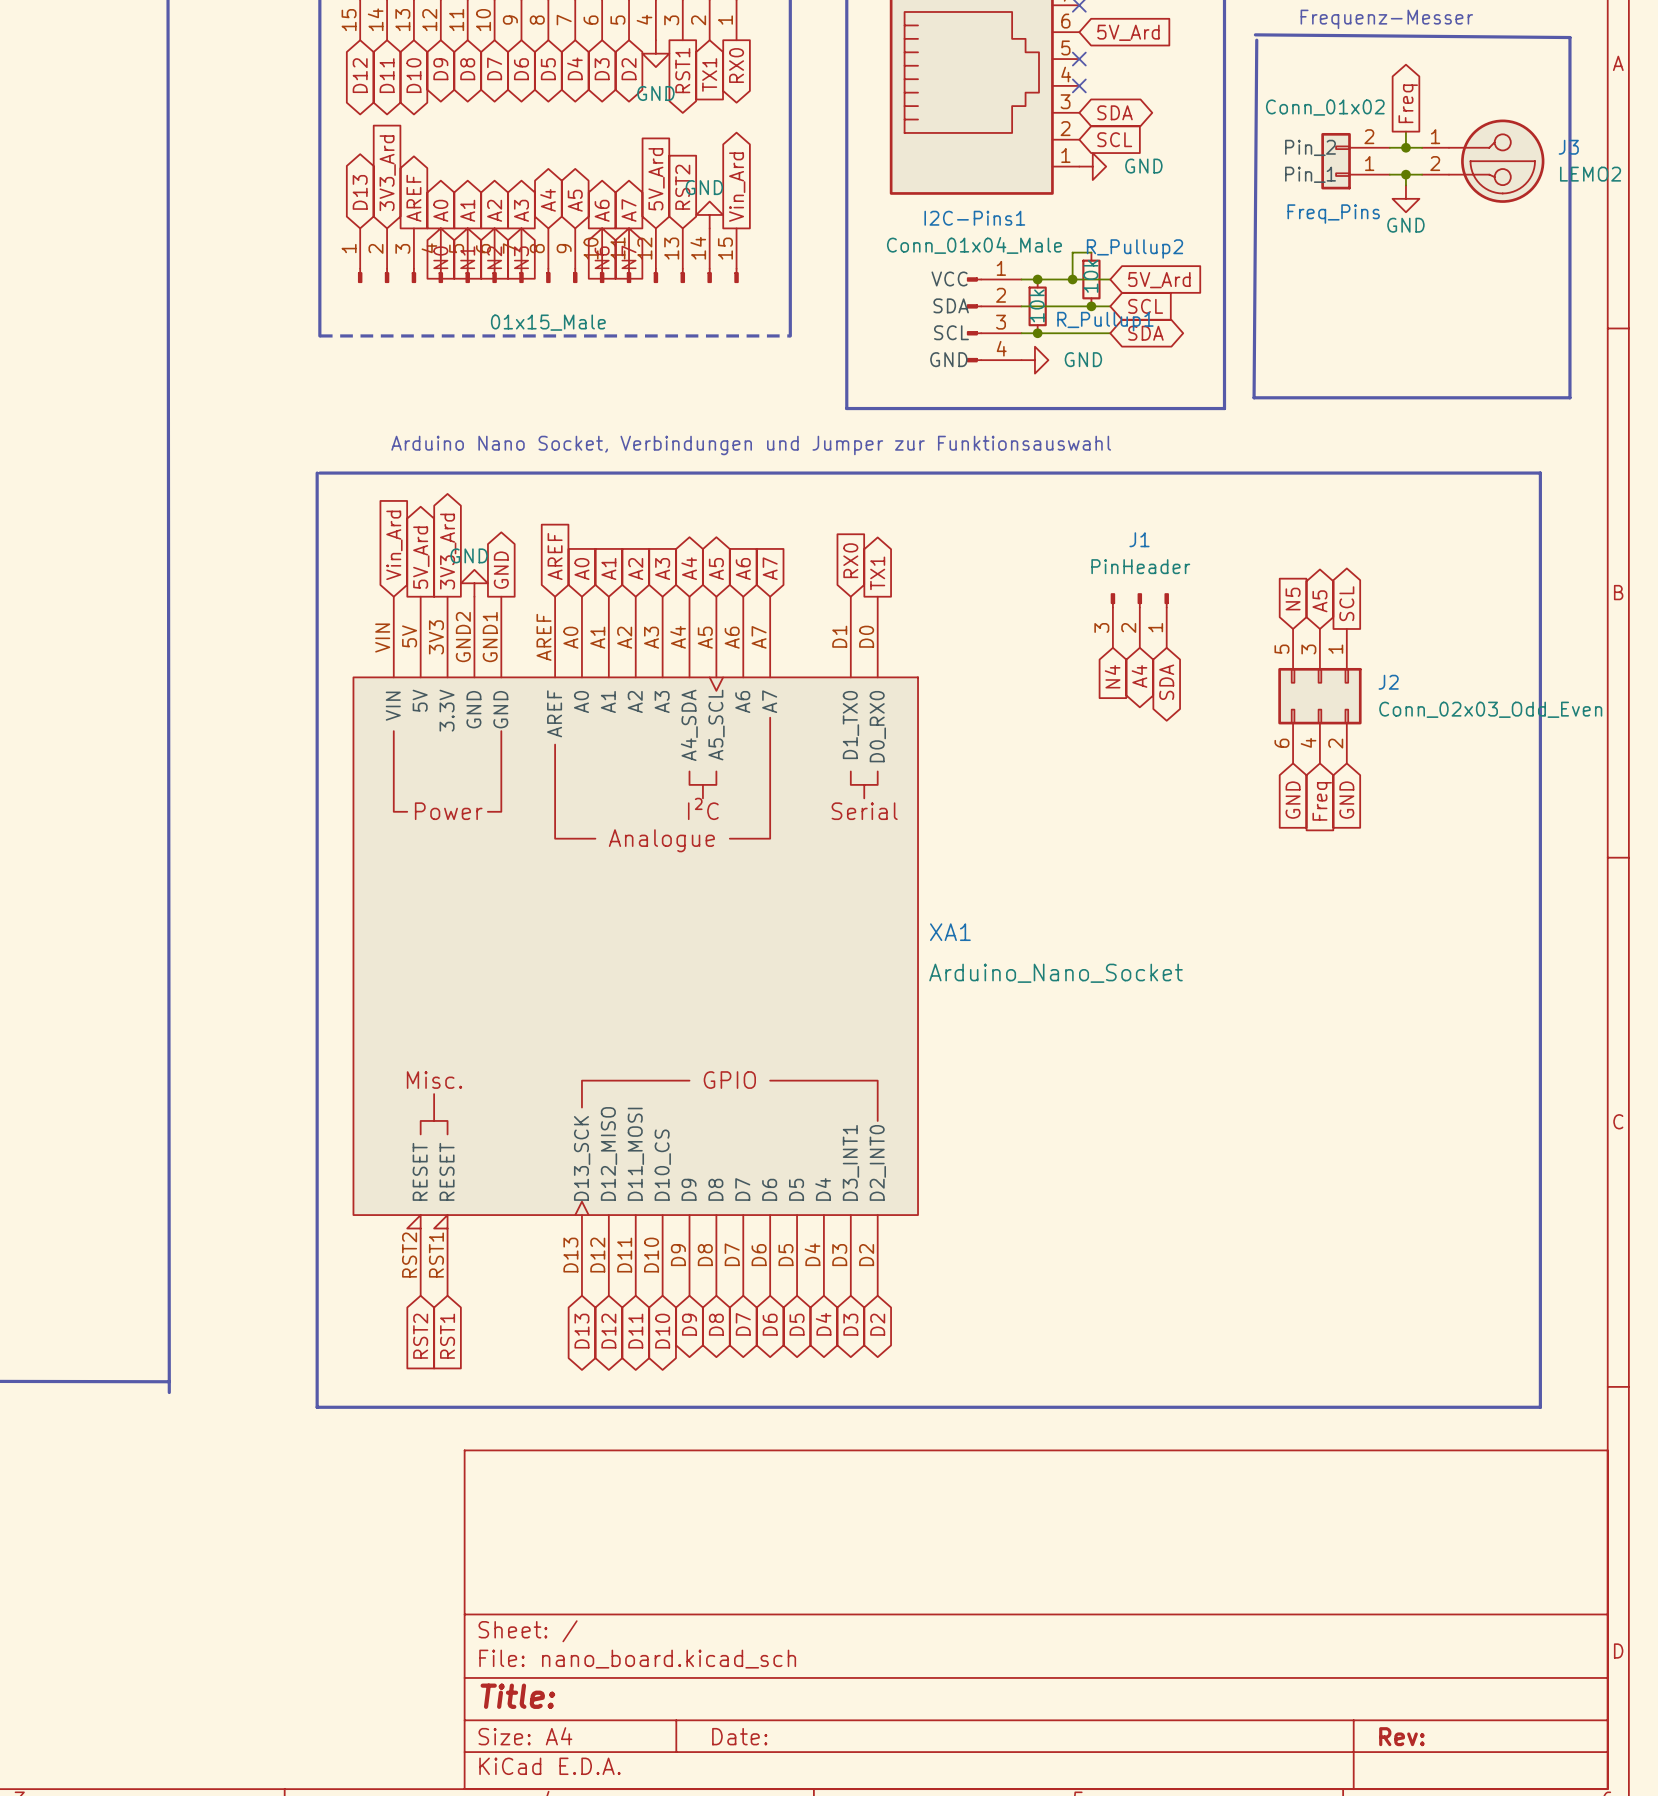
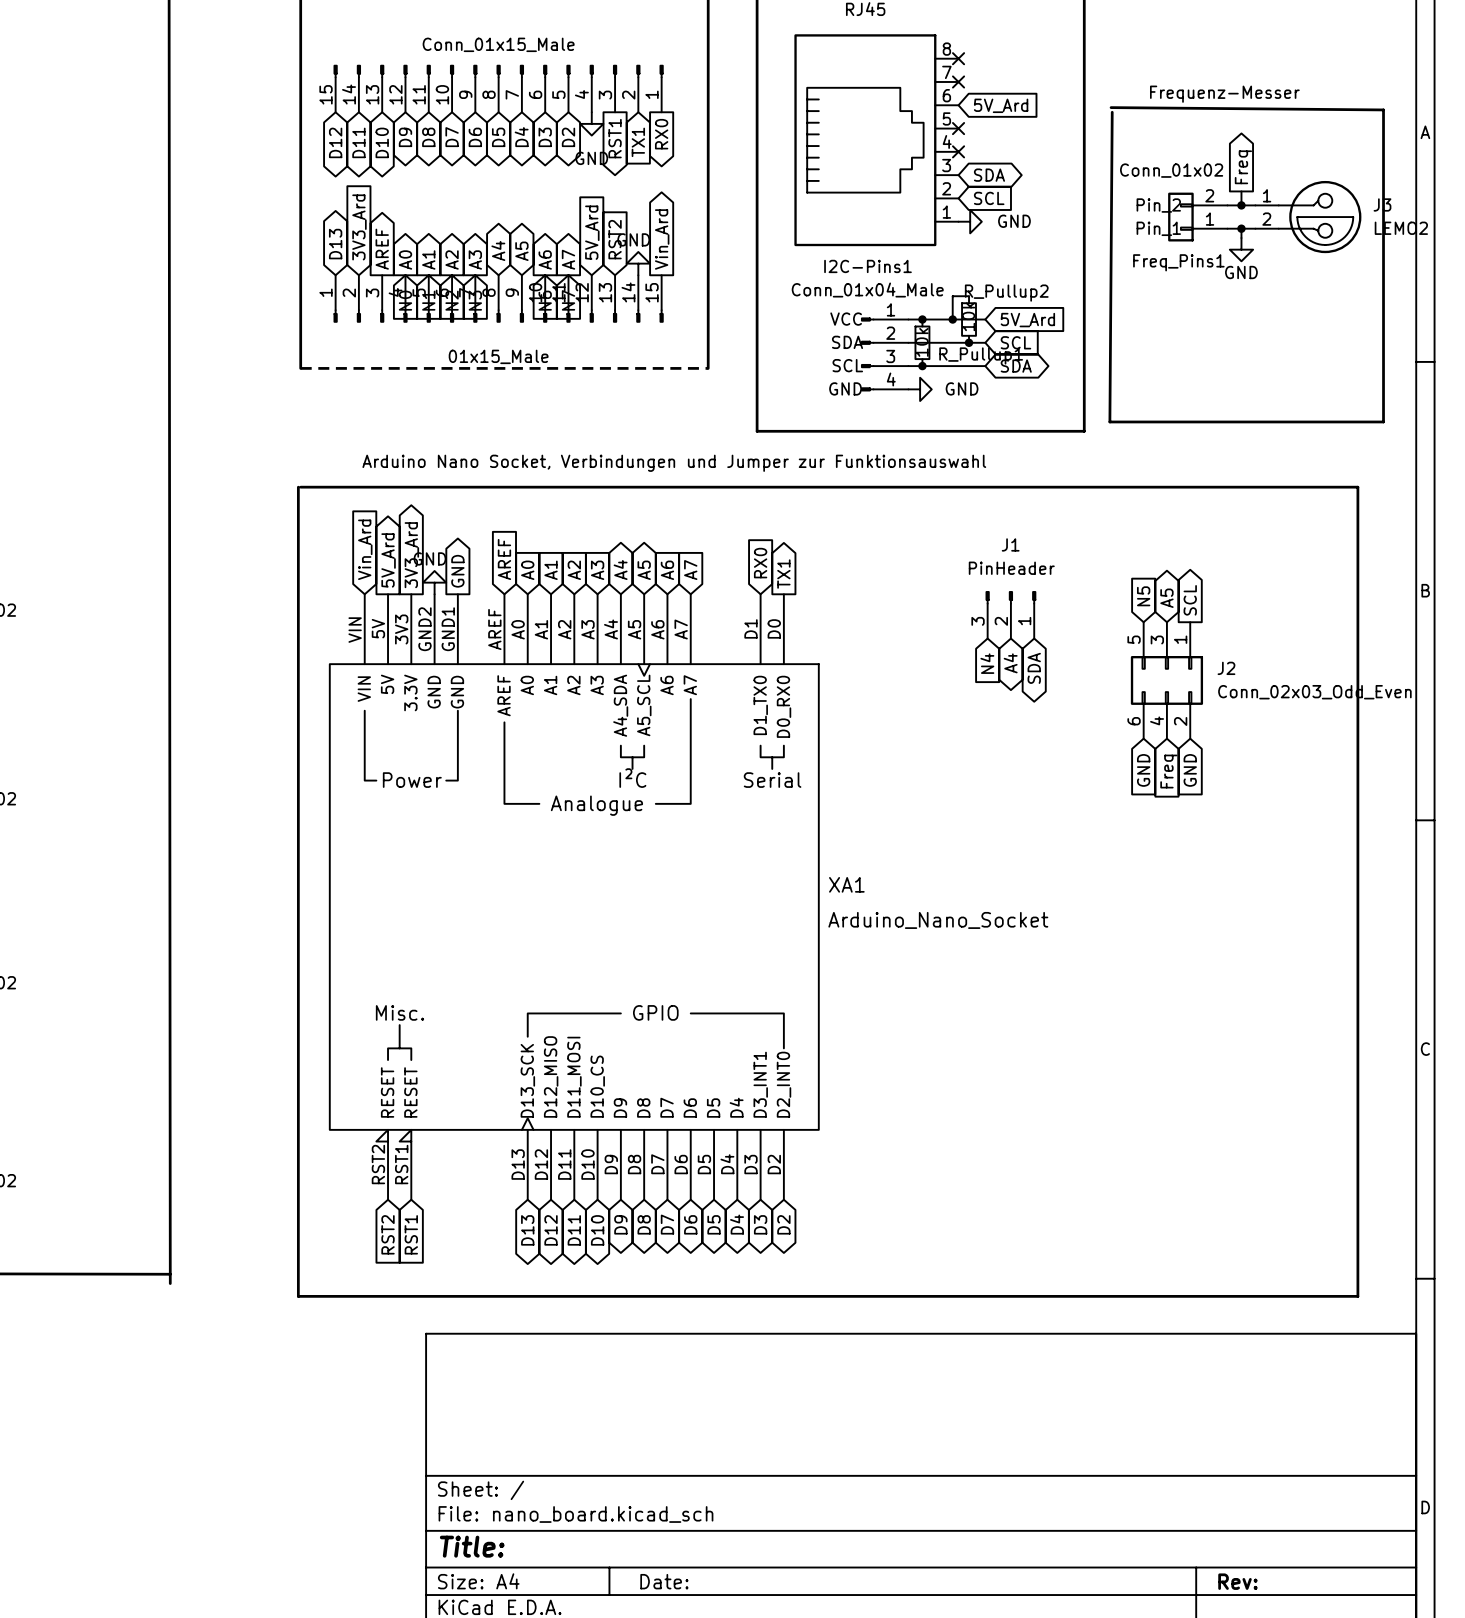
Freq_Pins name: Freq_Pins (1333, 214) -> Freq_Pins1 (1178, 262)

